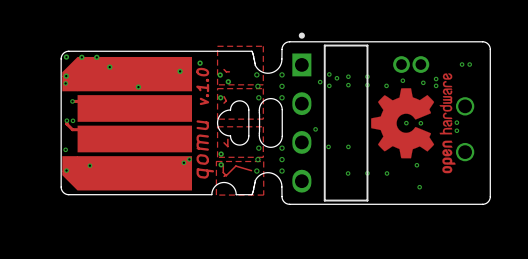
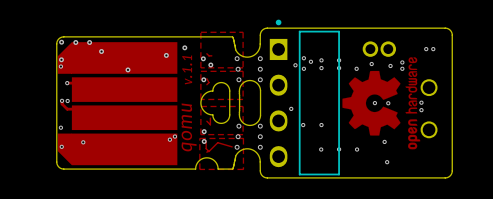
text: v.1.0 (202, 86) -> v.1.1 (187, 69)

